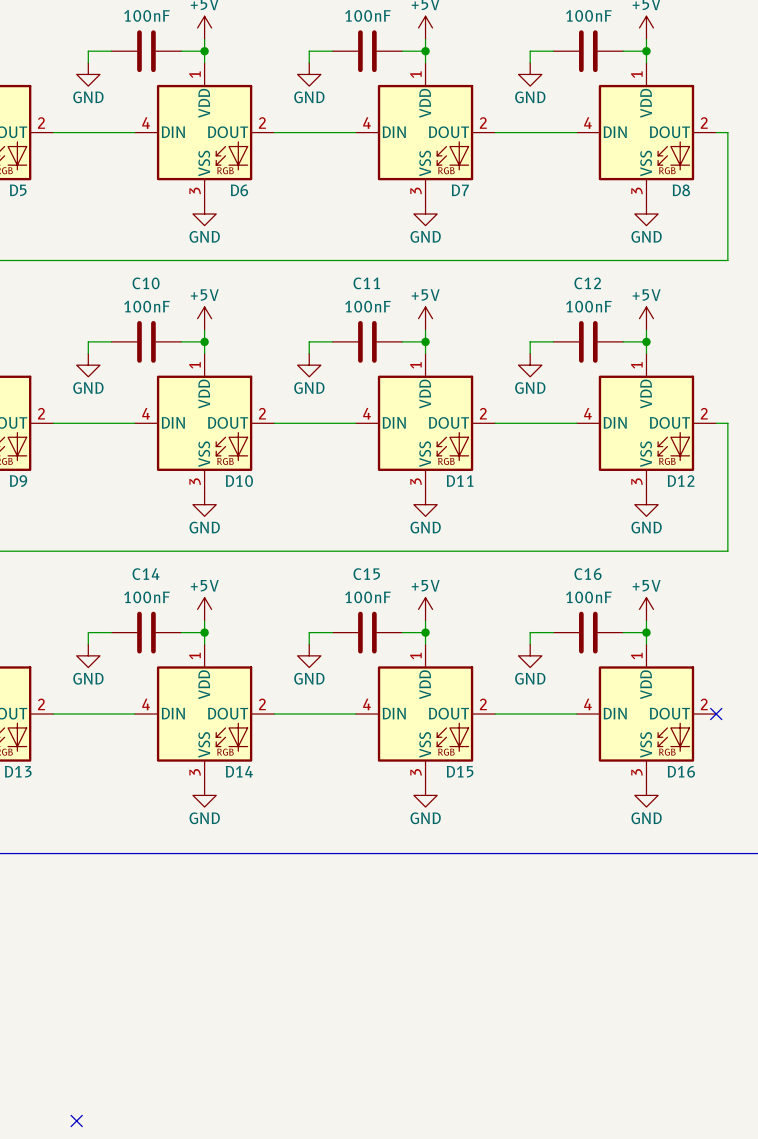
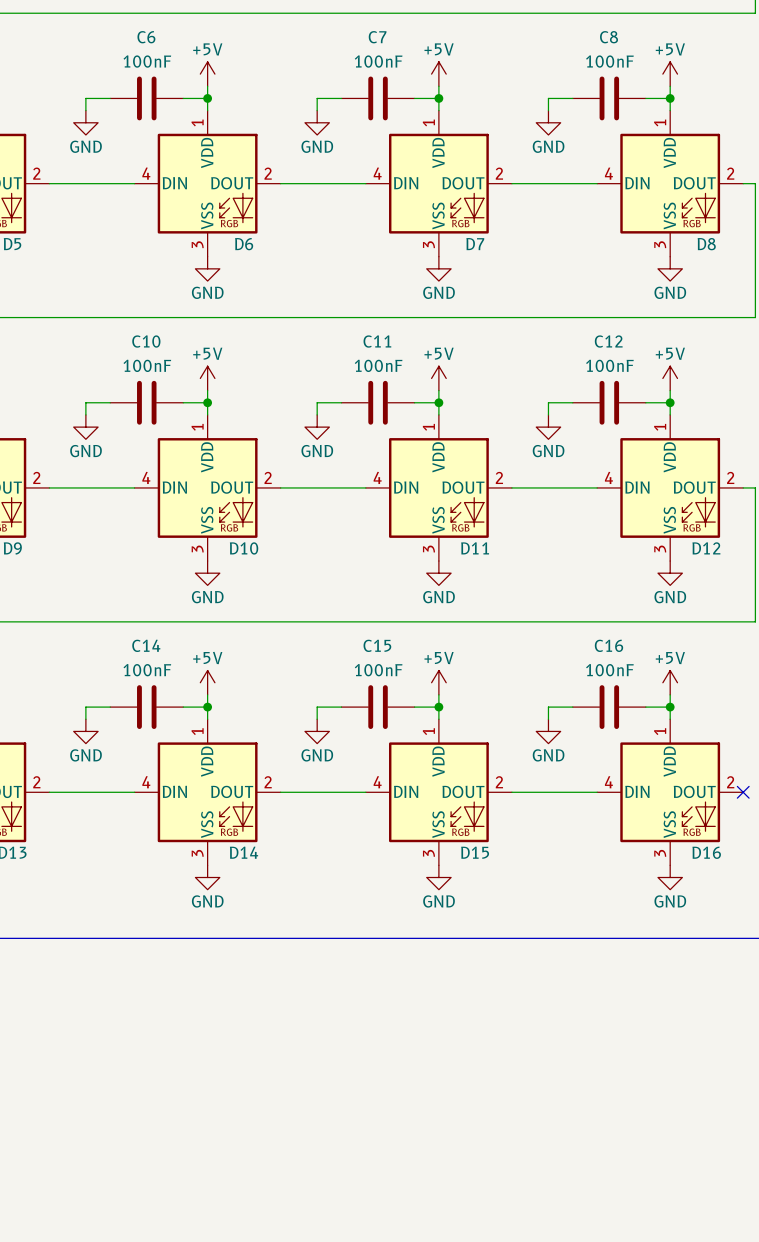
no-connect mark: (76, 1121) -> none

